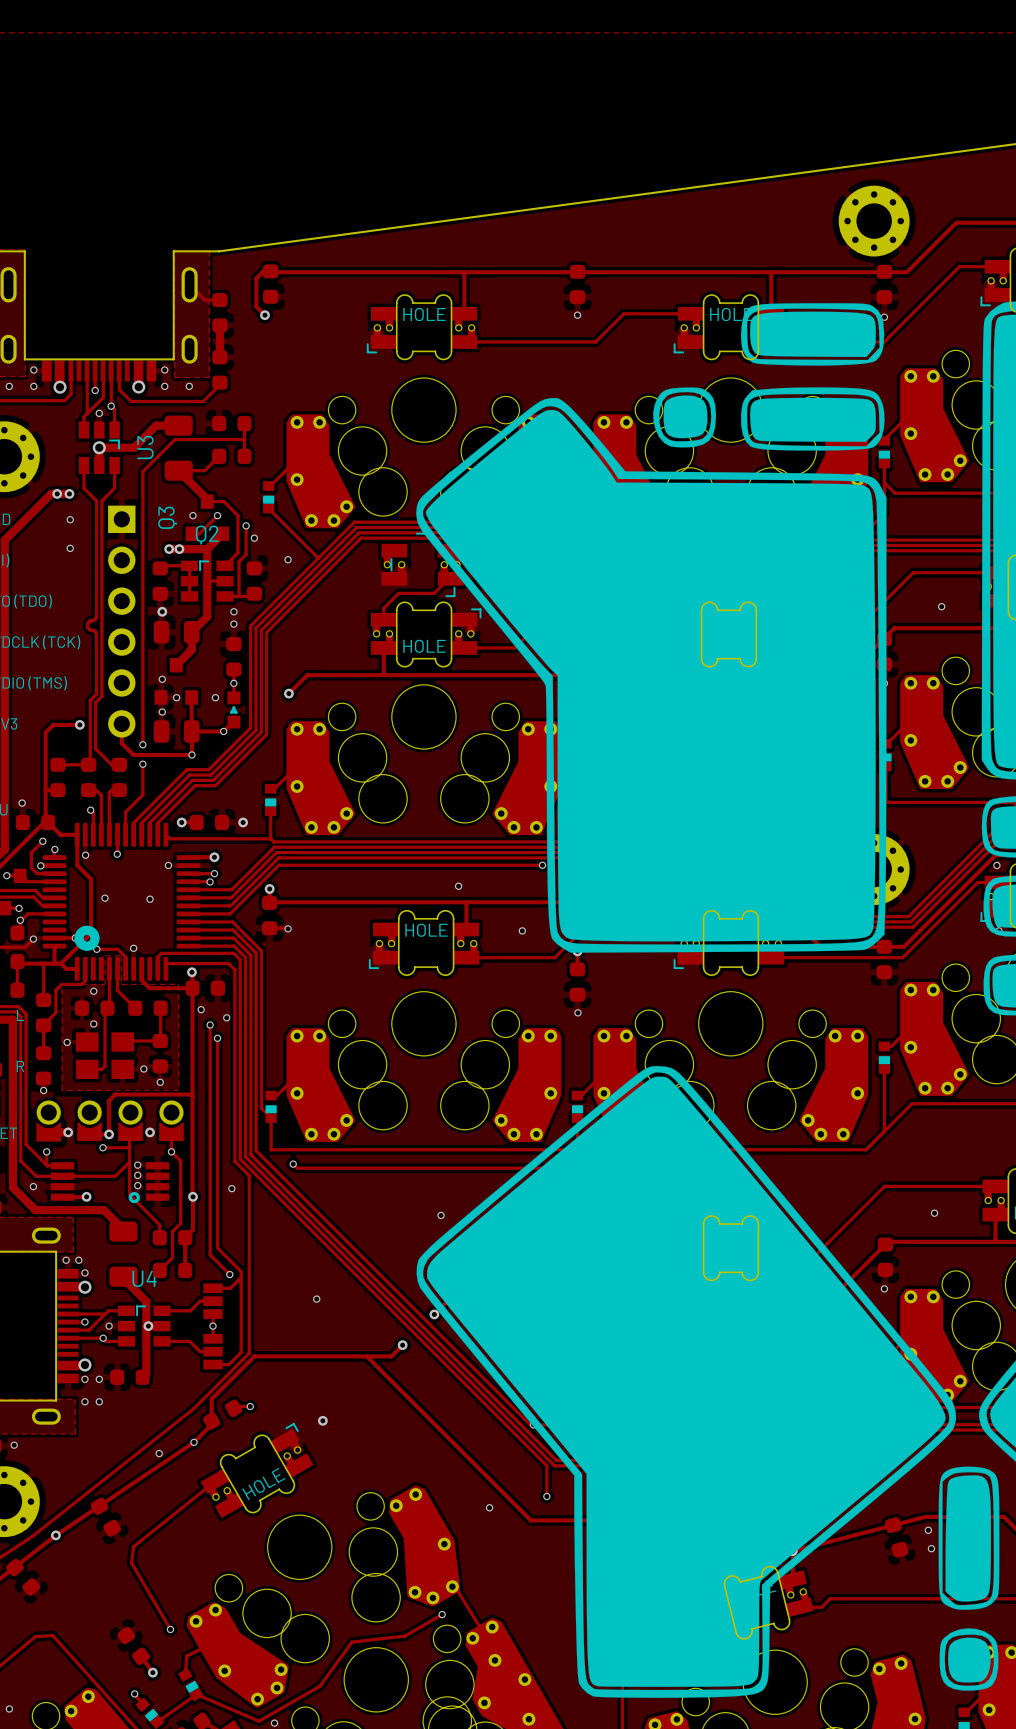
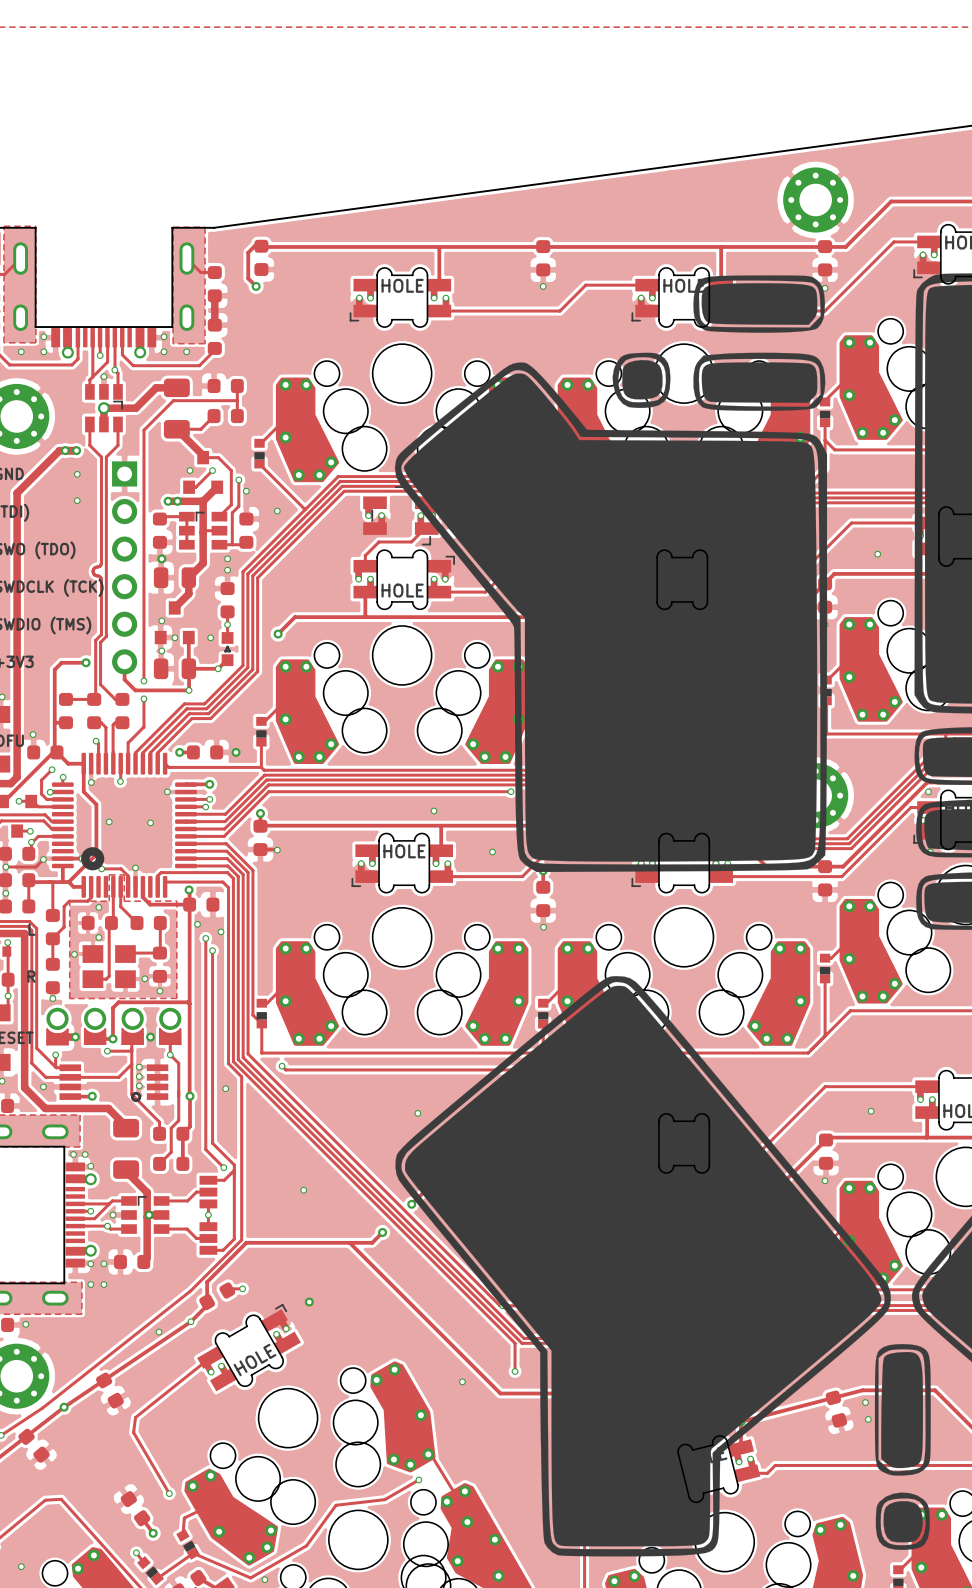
U3 name: U3 (145, 447) -> none
Q3 name: Q3 (167, 517) -> none
Q2 name: Q2 (207, 535) -> none
U4 name: U4 (144, 1278) -> none

